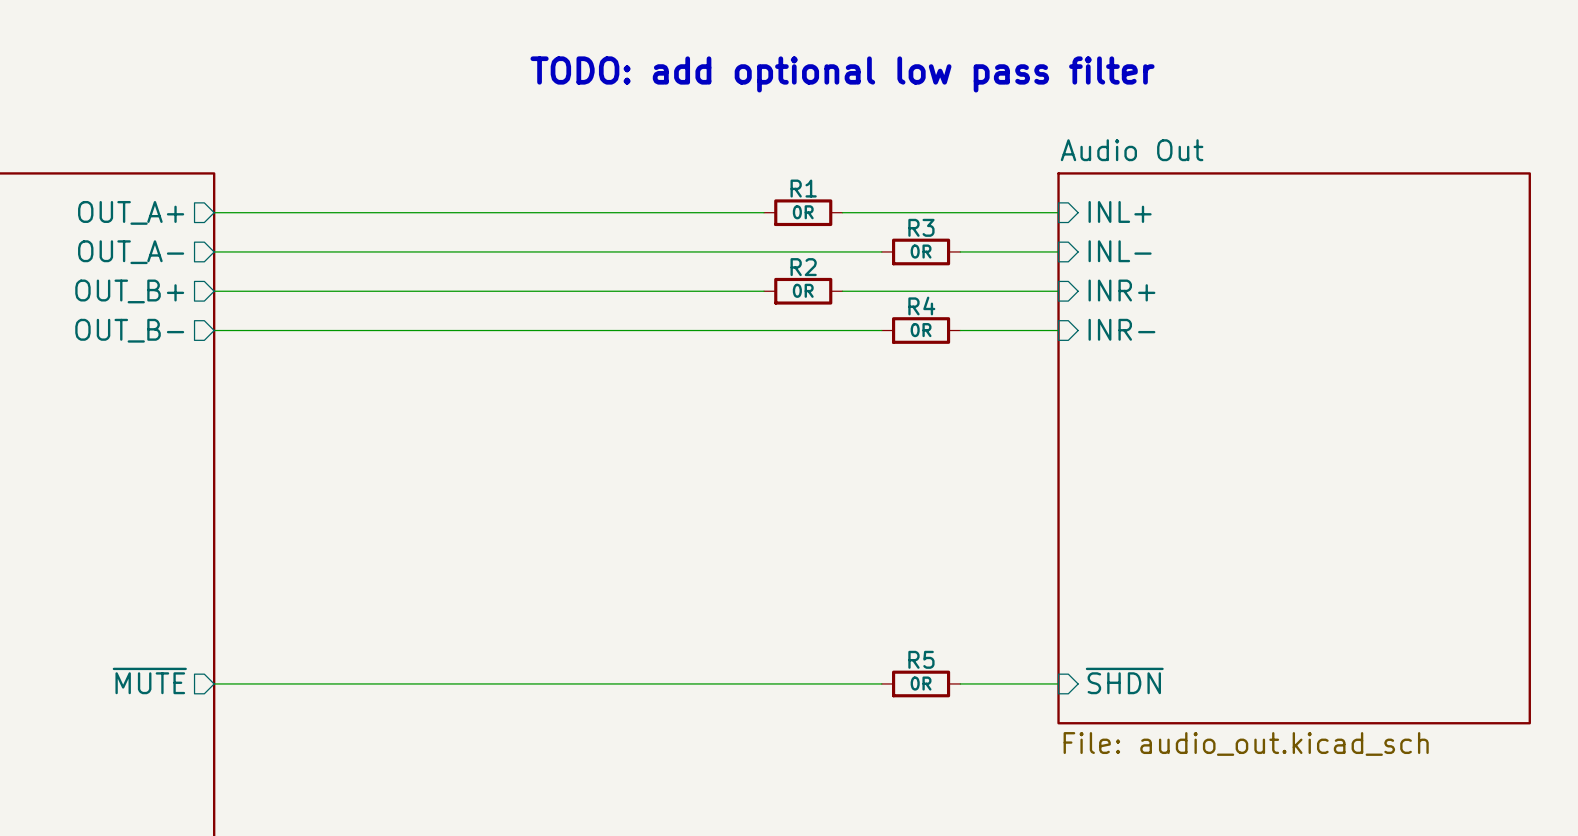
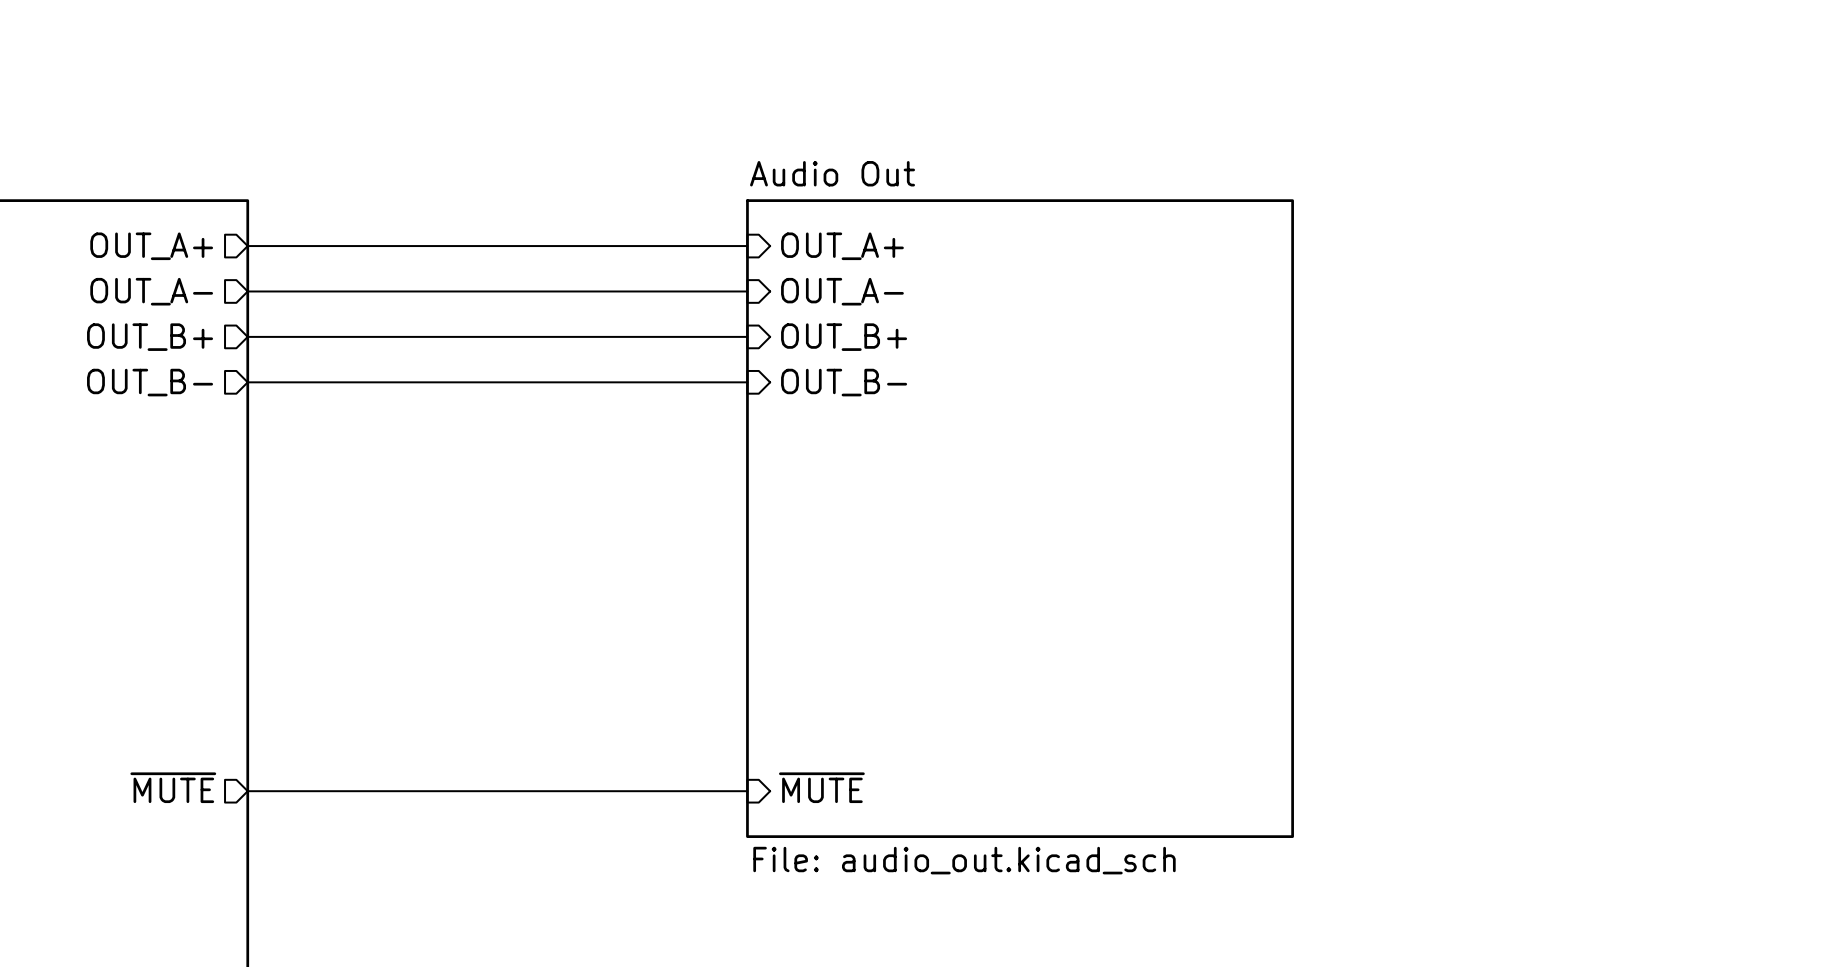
text: TODO: add optional low pass filter (842, 74) -> none
sheet pin: INL+ (1120, 211) -> none
wire: (646, 212) (763, 212) -> none
sheet pin: none -> OUT_A+ (842, 246)
R1: 0R (803, 212) -> none
wire: (842, 212) (1058, 212) -> none
wire: (646, 251) (881, 251) -> none
R3: 0R (921, 251) -> none
wire: (960, 251) (1058, 251) -> none
sheet pin: INL- (1120, 251) -> none
sheet pin: none -> OUT_A- (842, 291)
sheet pin: INR+ (1121, 290) -> none
wire: (646, 291) (763, 291) -> none
sheet pin: none -> OUT_B+ (844, 337)
R2: 0R (803, 291) -> none
wire: (842, 291) (1058, 291) -> none
sheet pin: INR- (1121, 329) -> none
wire: (646, 330) (881, 330) -> none
sheet pin: none -> OUT_B- (844, 382)
R4: 0R (921, 330) -> none
wire: (960, 330) (1058, 330) -> none
sheet Audio Out: none -> File: audio_out.kicad_sch (1020, 518)
sheet Audio Out: File: audio_out.kicad_sch (1294, 448) -> none
sheet pin: none -> ~{MUTE} (821, 787)
sheet pin: ~{SHDN} (1124, 680) -> none
wire: (646, 683) (881, 683) -> none
R5: 0R (921, 683) -> none
wire: (960, 683) (1058, 683) -> none

